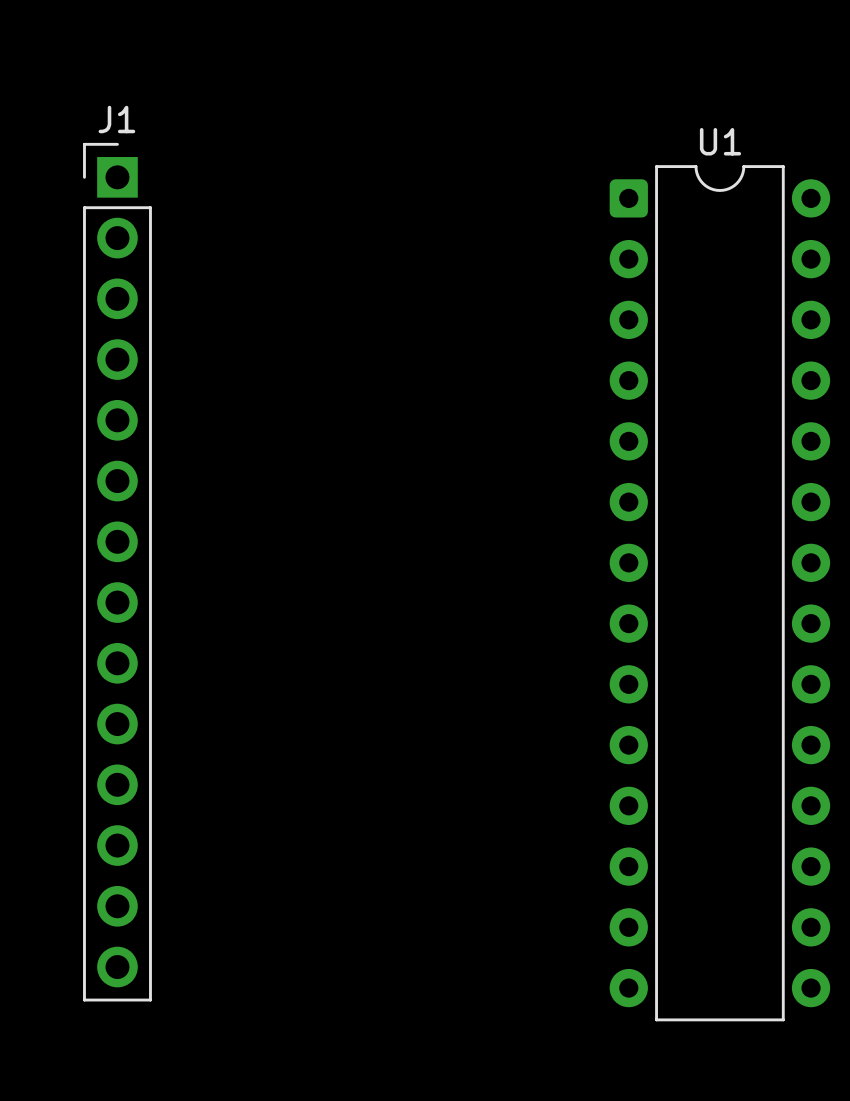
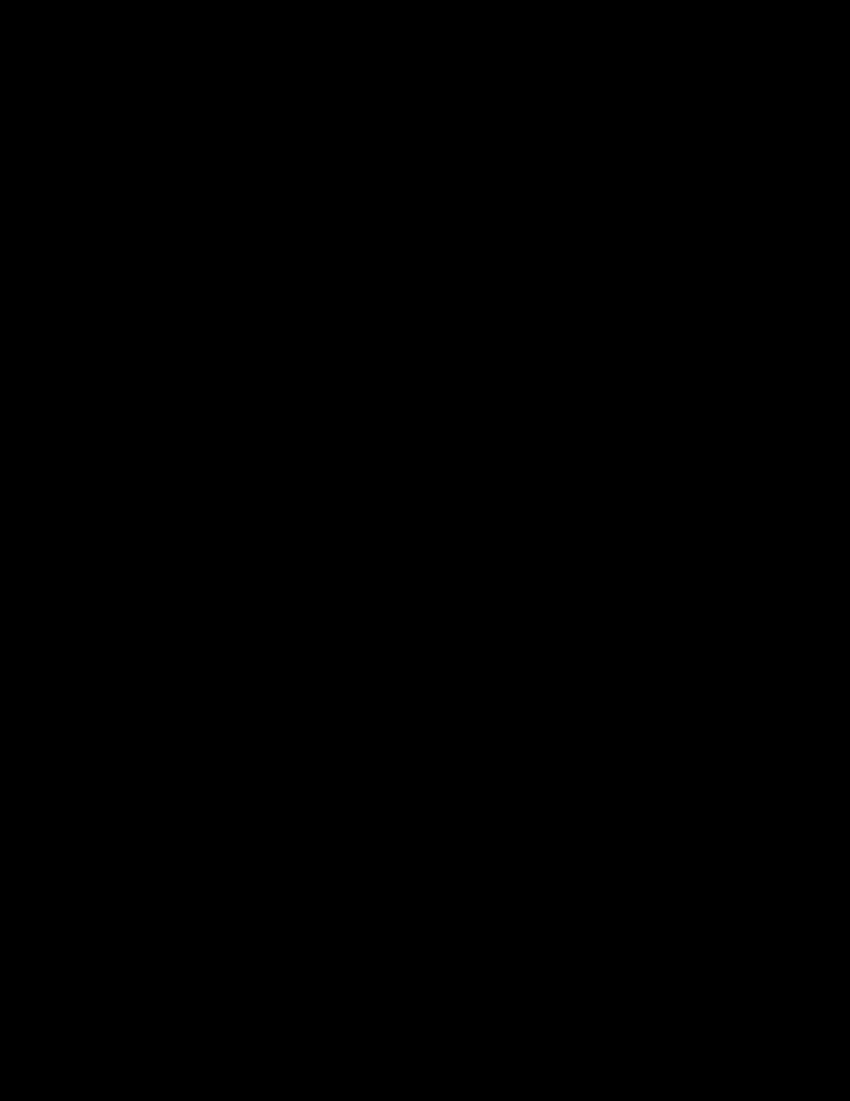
J1: (117, 572) -> none
U1: (719, 593) -> none

